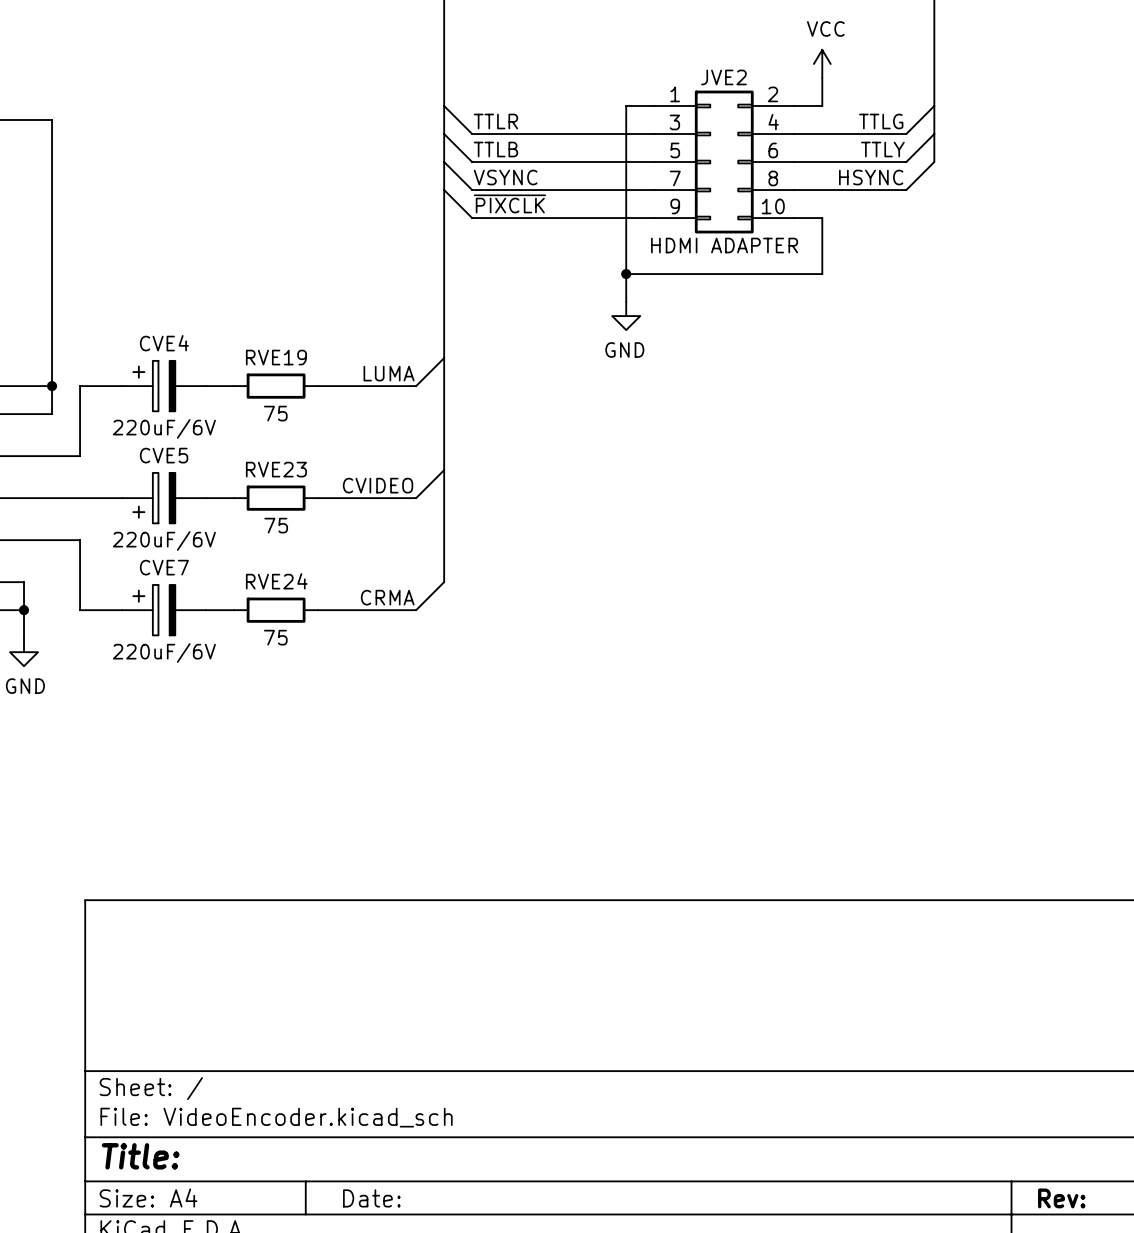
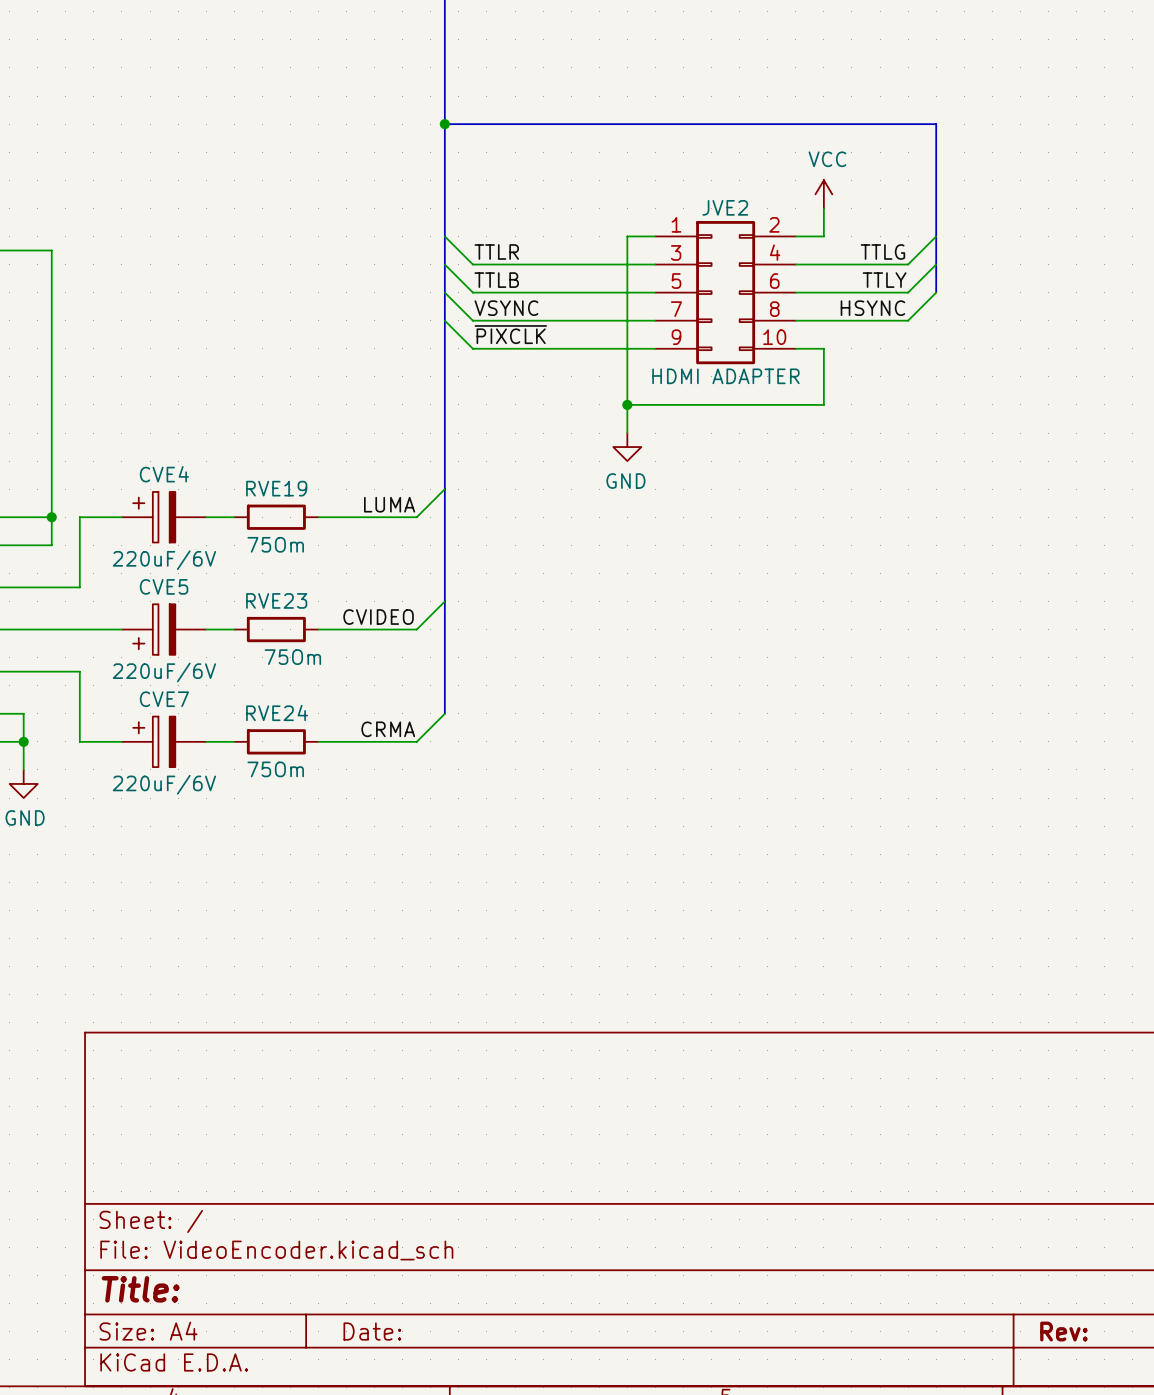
RVE19 value: 75 (275, 413) -> 75Om (275, 544)
RVE23 value: 75 (276, 525) -> 75Om (292, 657)
RVE24 value: 75 (275, 637) -> 75Om (275, 769)

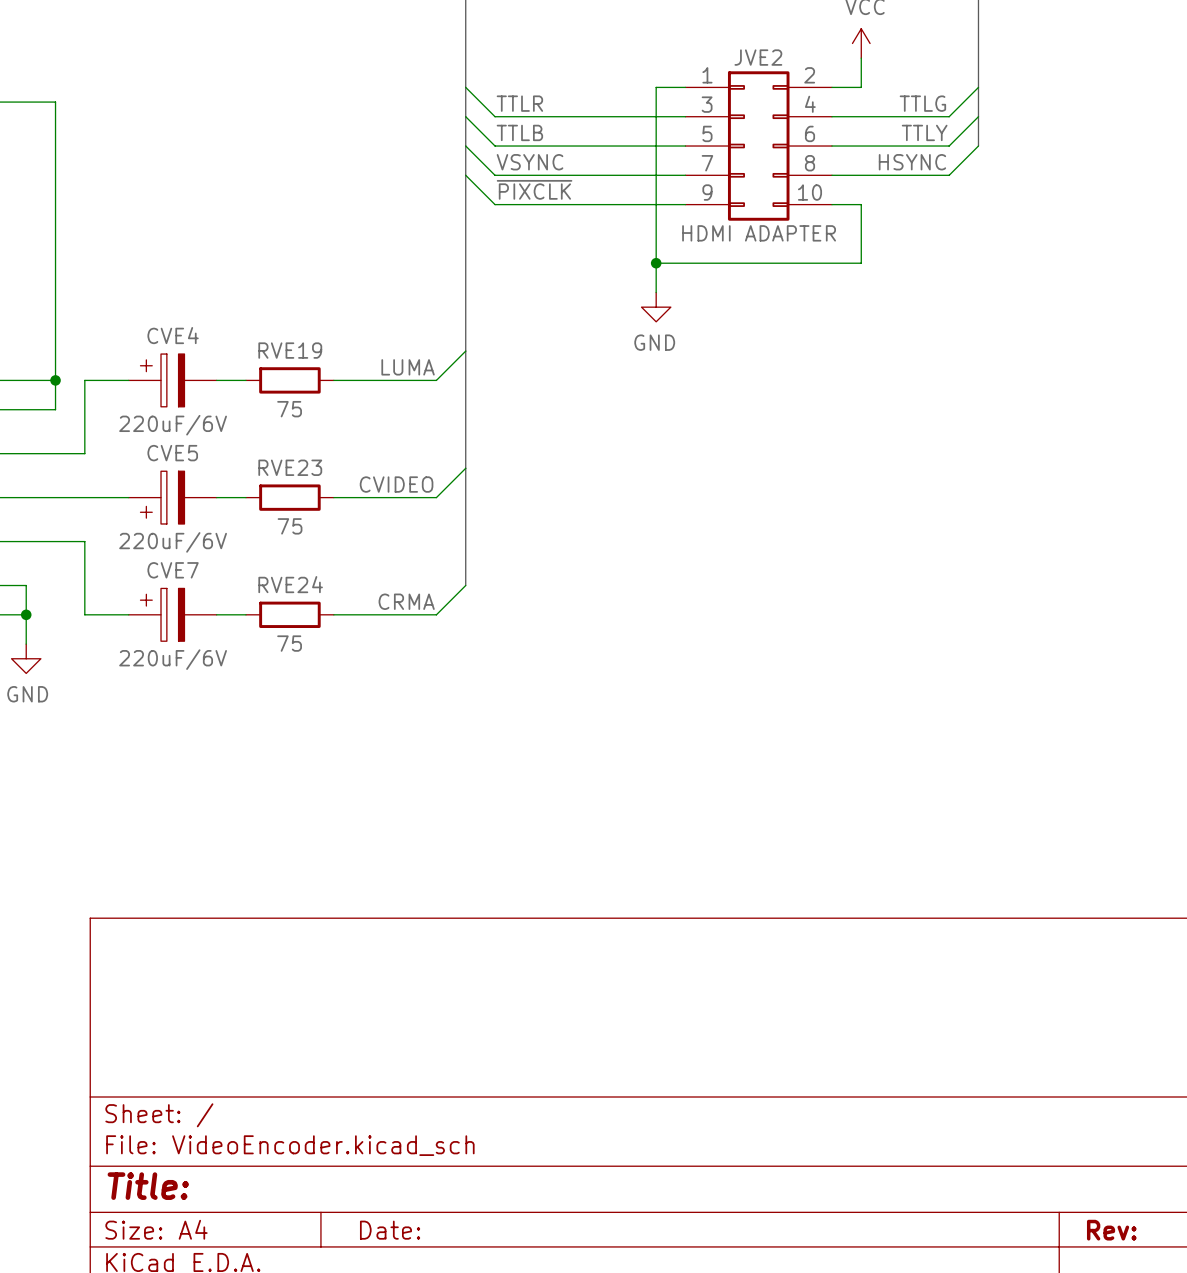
RVE19 value: 75Om (275, 544) -> 75 (289, 409)
RVE23 value: 75Om (292, 657) -> 75 (290, 526)
RVE24 value: 75Om (275, 769) -> 75 (289, 643)

